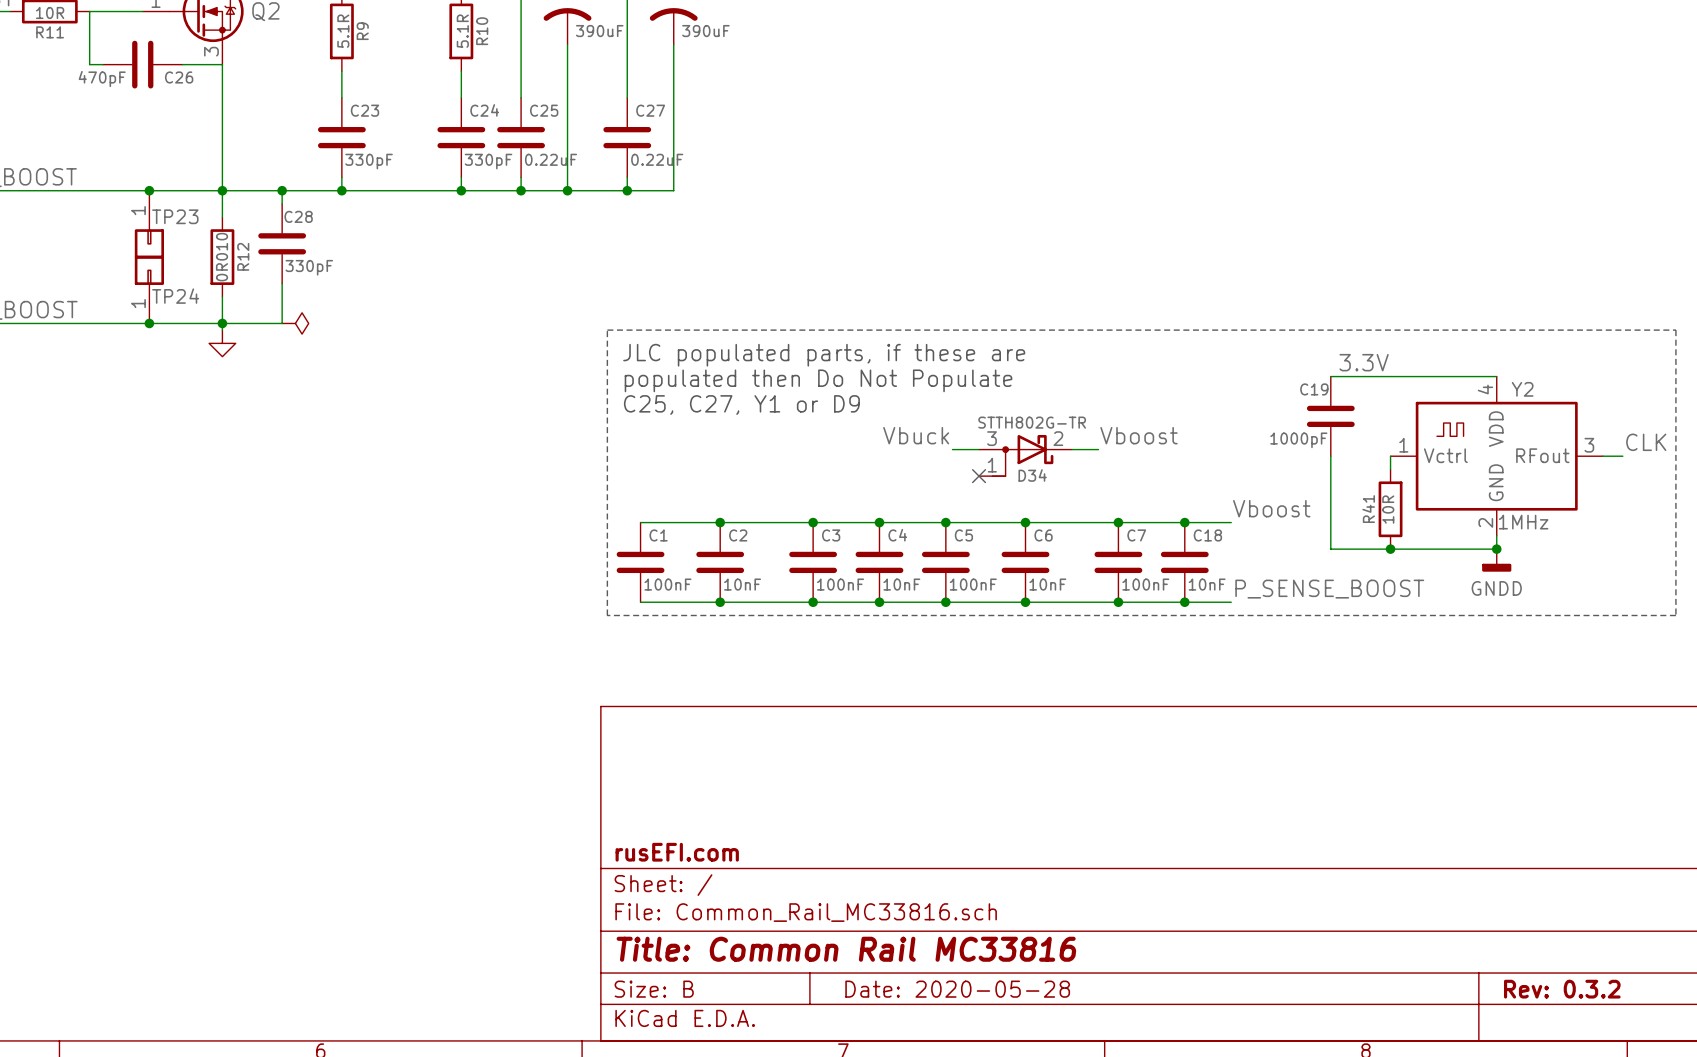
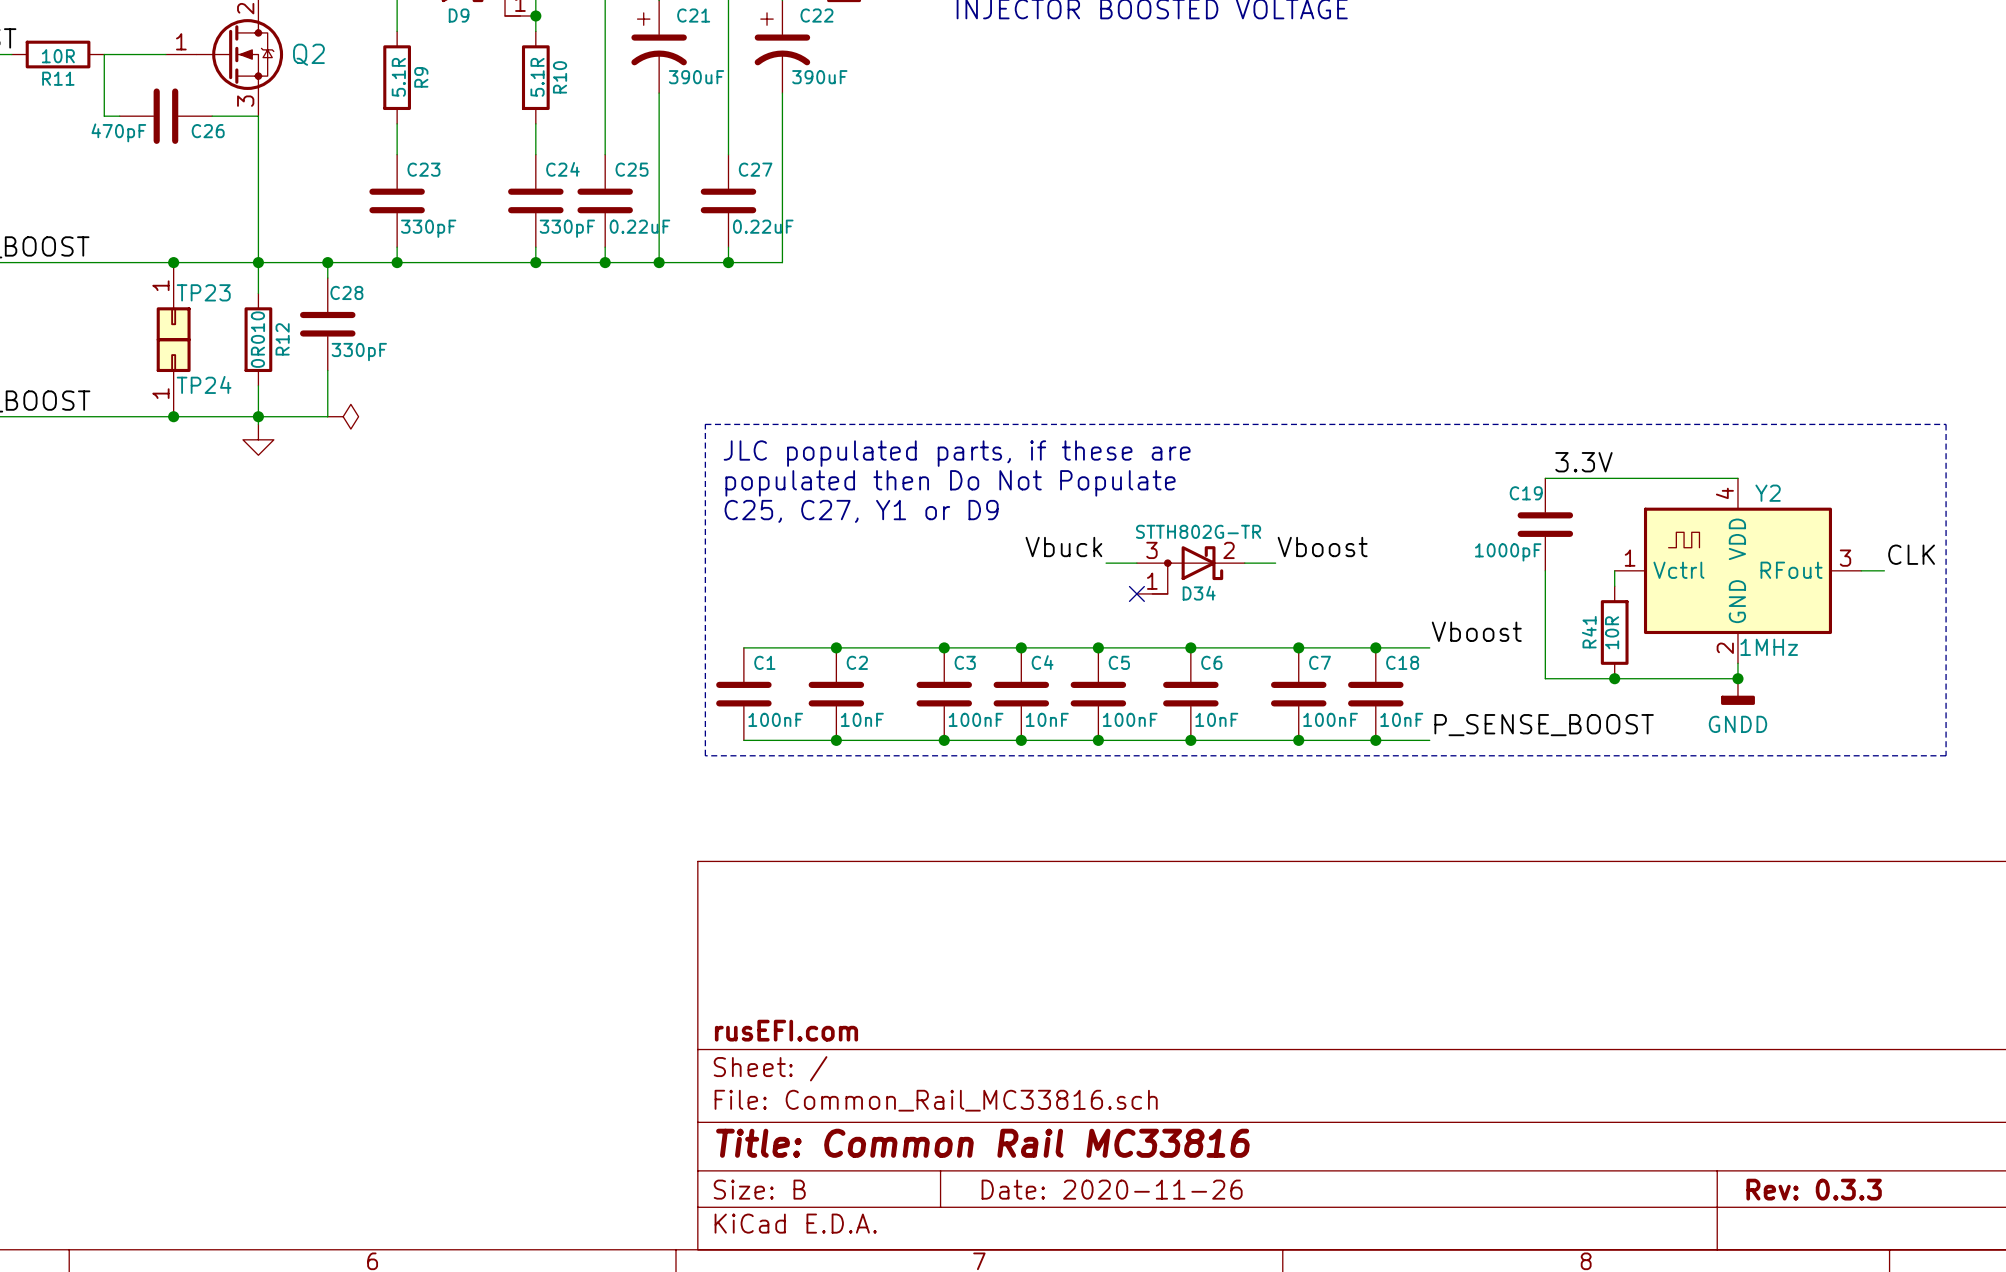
title block: Date: 2020-05-28 (957, 989) -> Date: 2020-11-26 (1112, 1189)
title block: Rev: 0.3.2 (1562, 989) -> Rev: 0.3.3 (1814, 1189)

